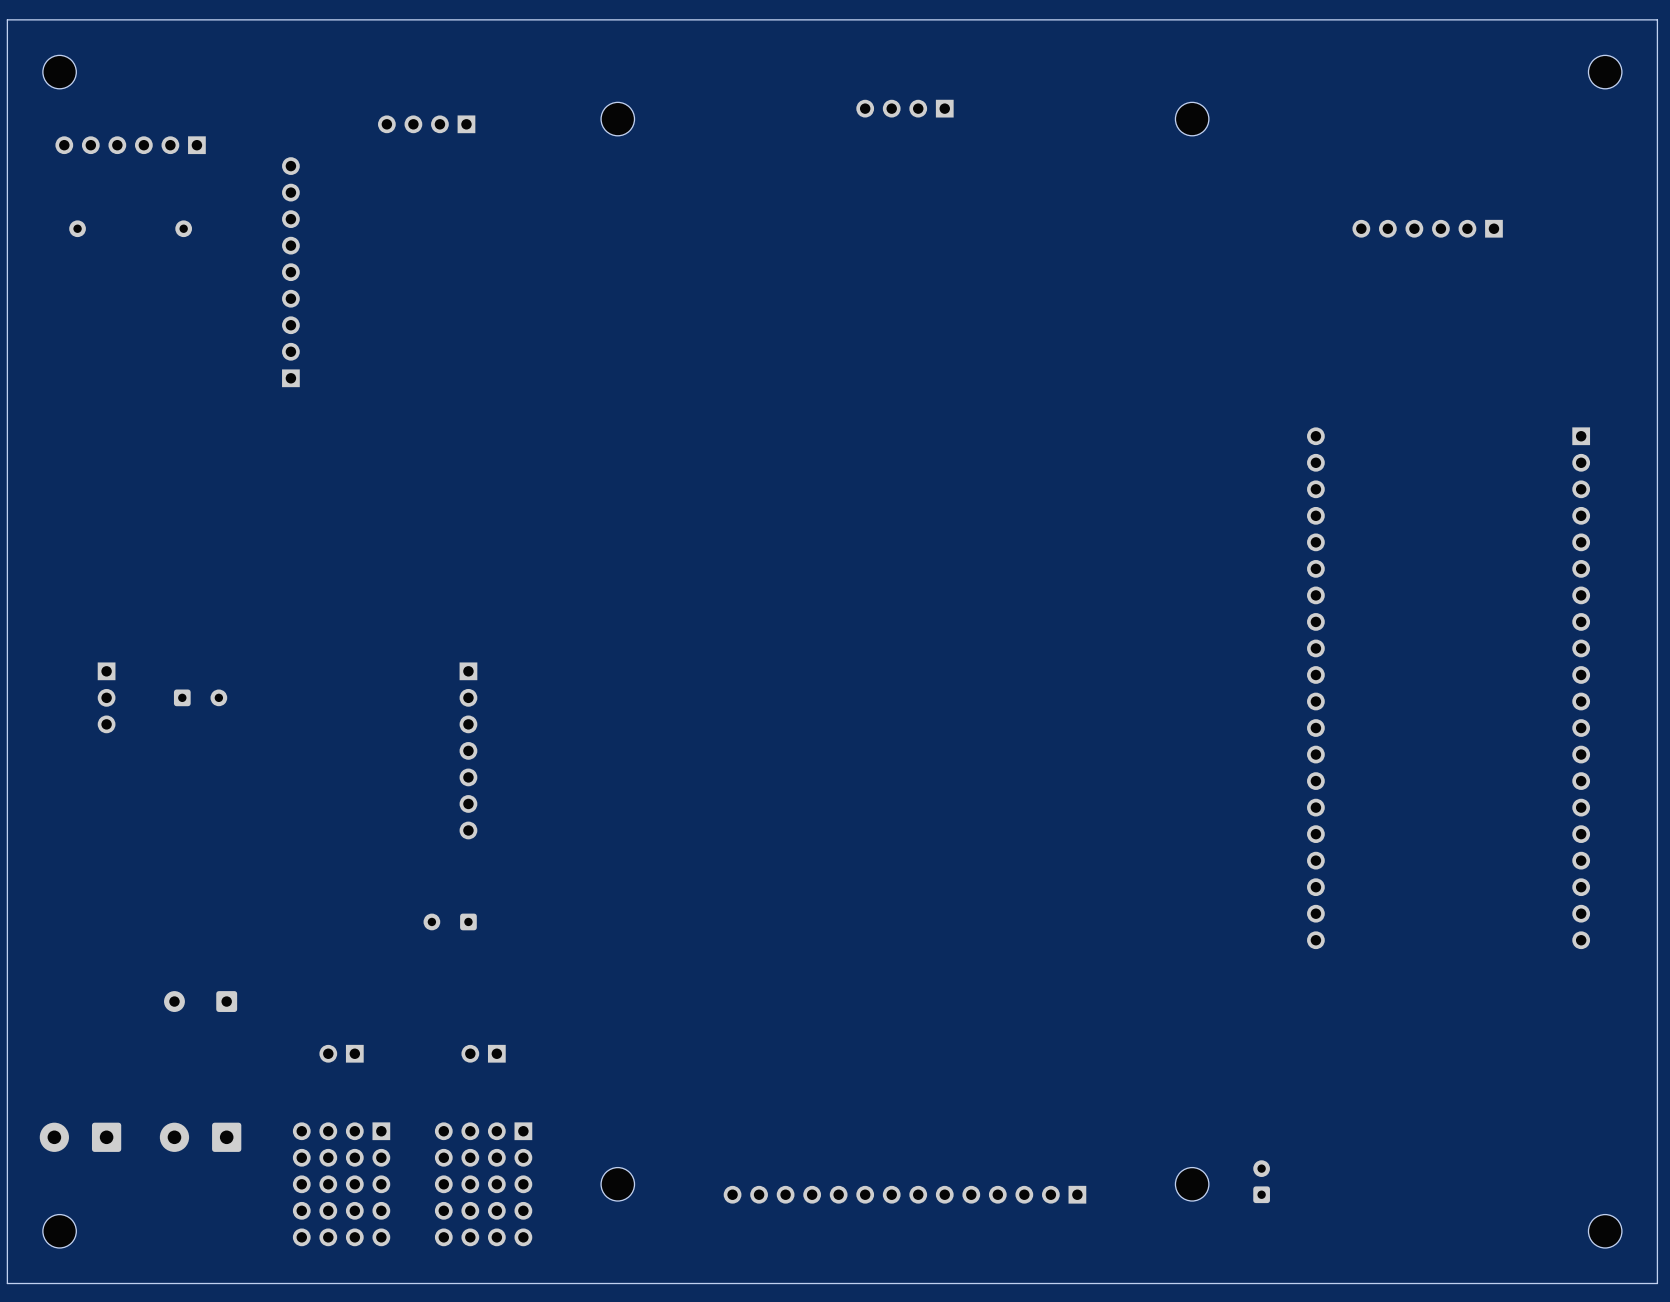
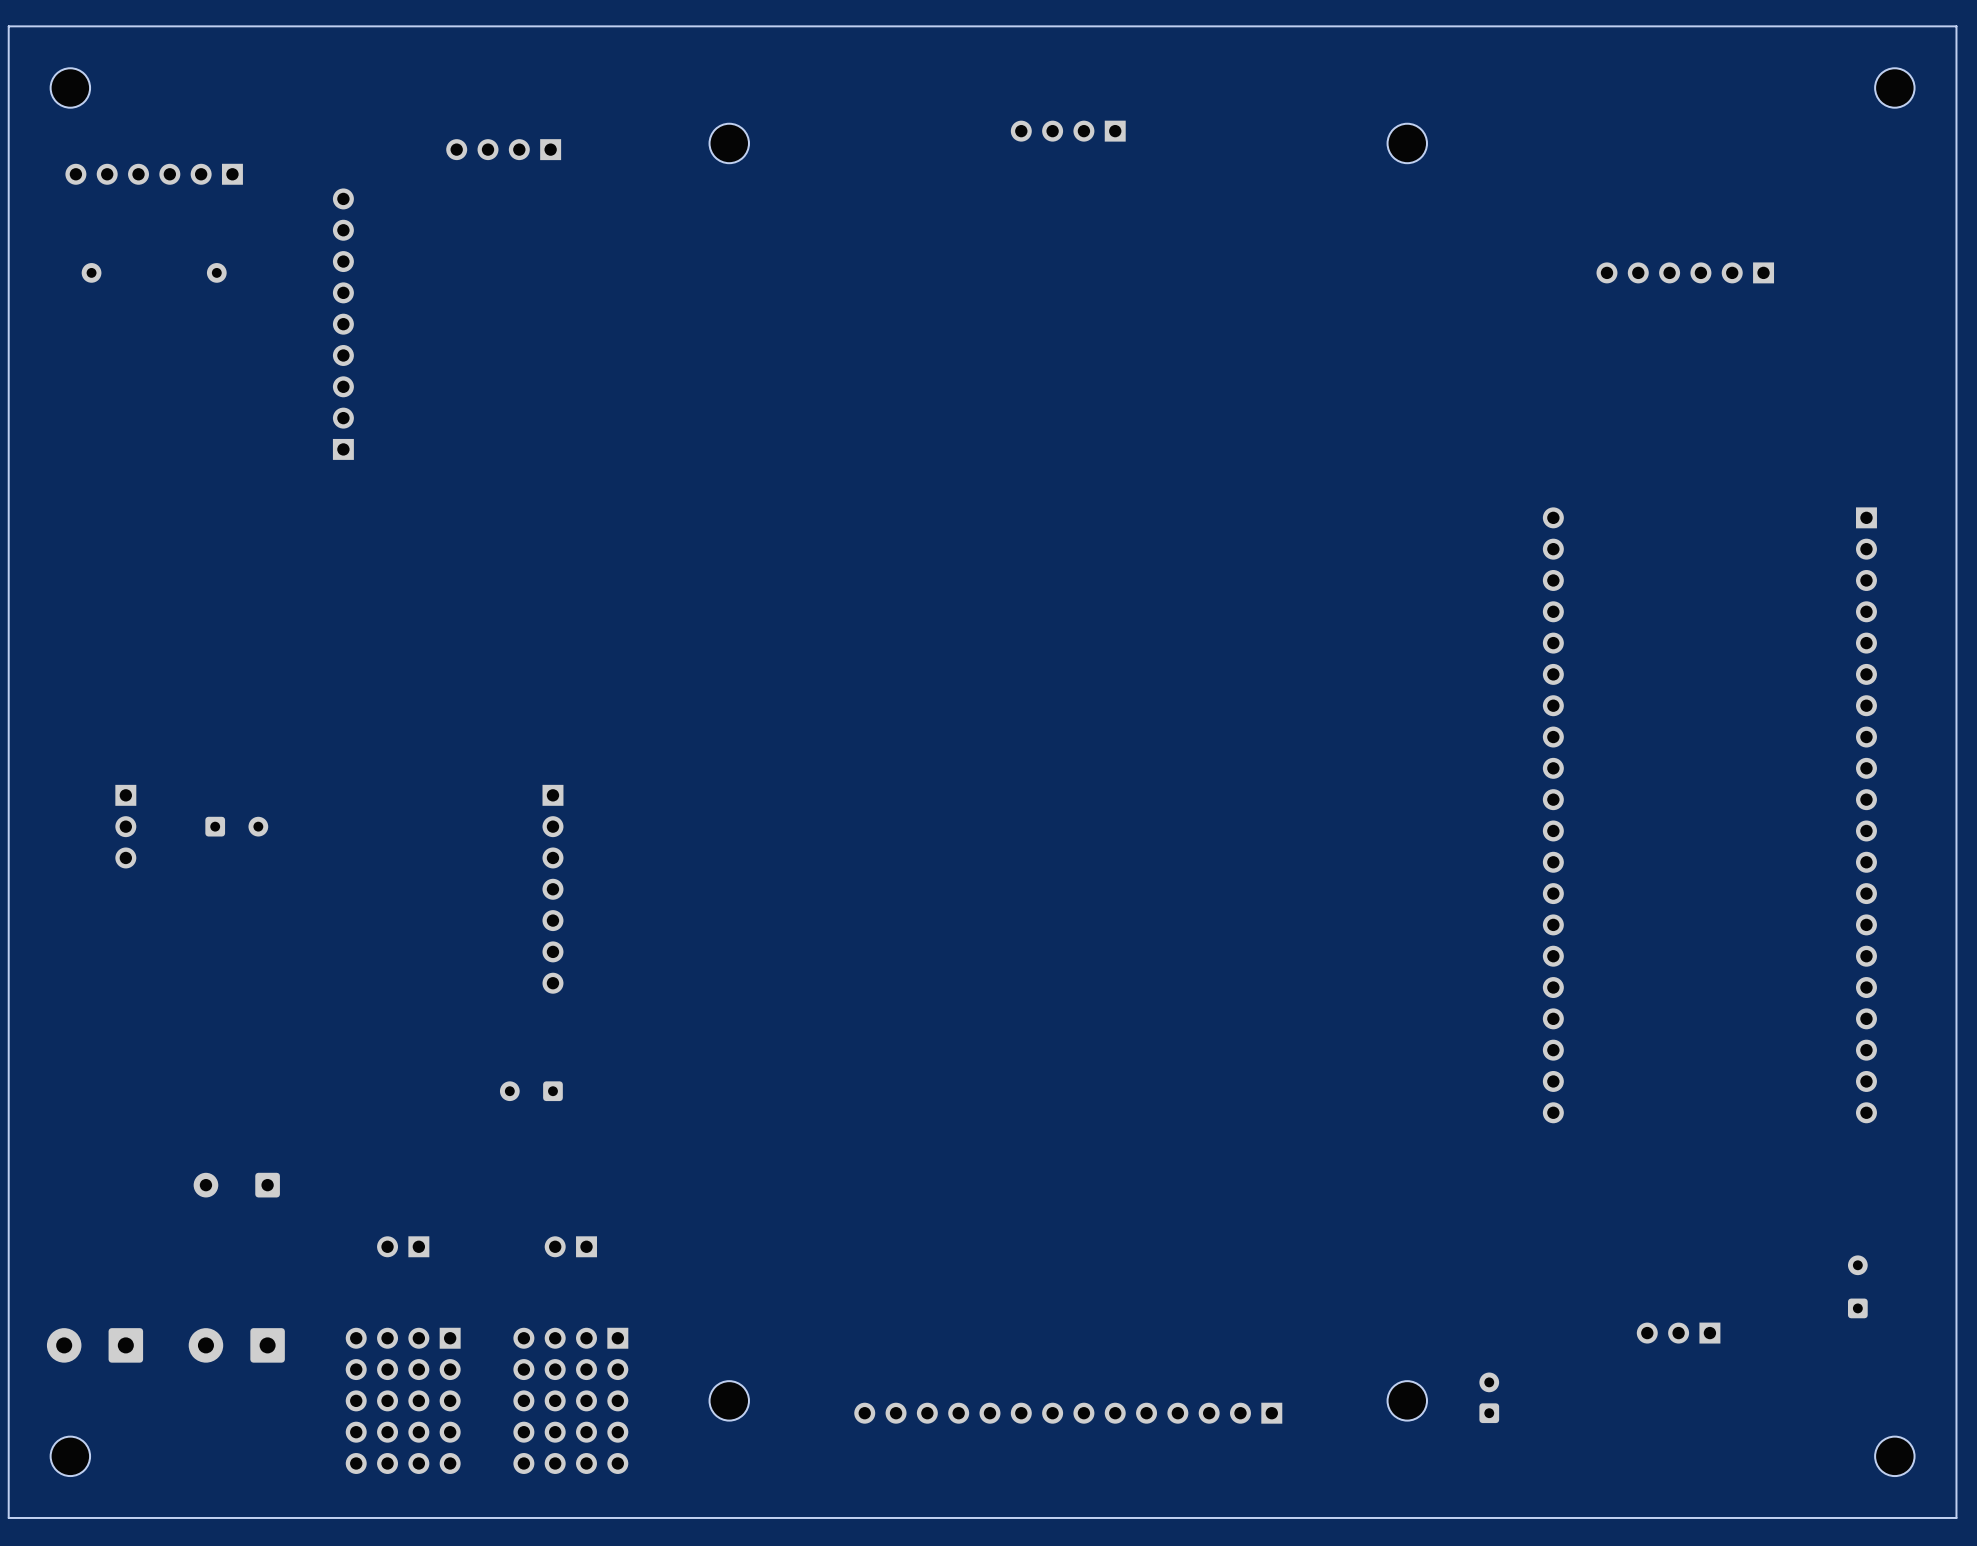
part: none -> (1857, 1286)
part: none -> (1678, 1333)

